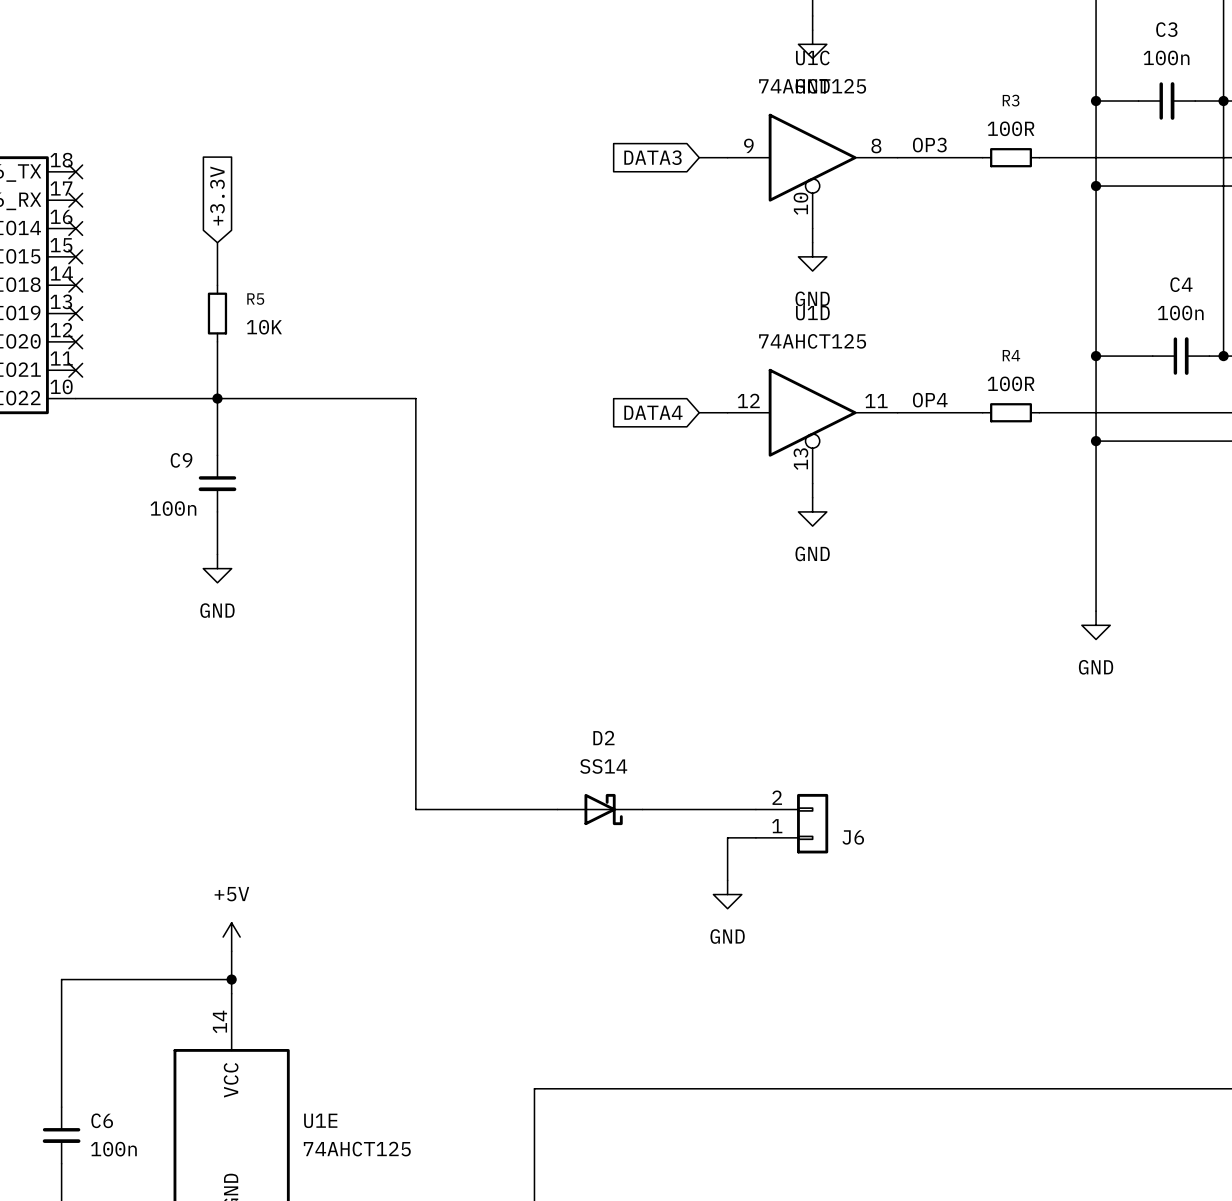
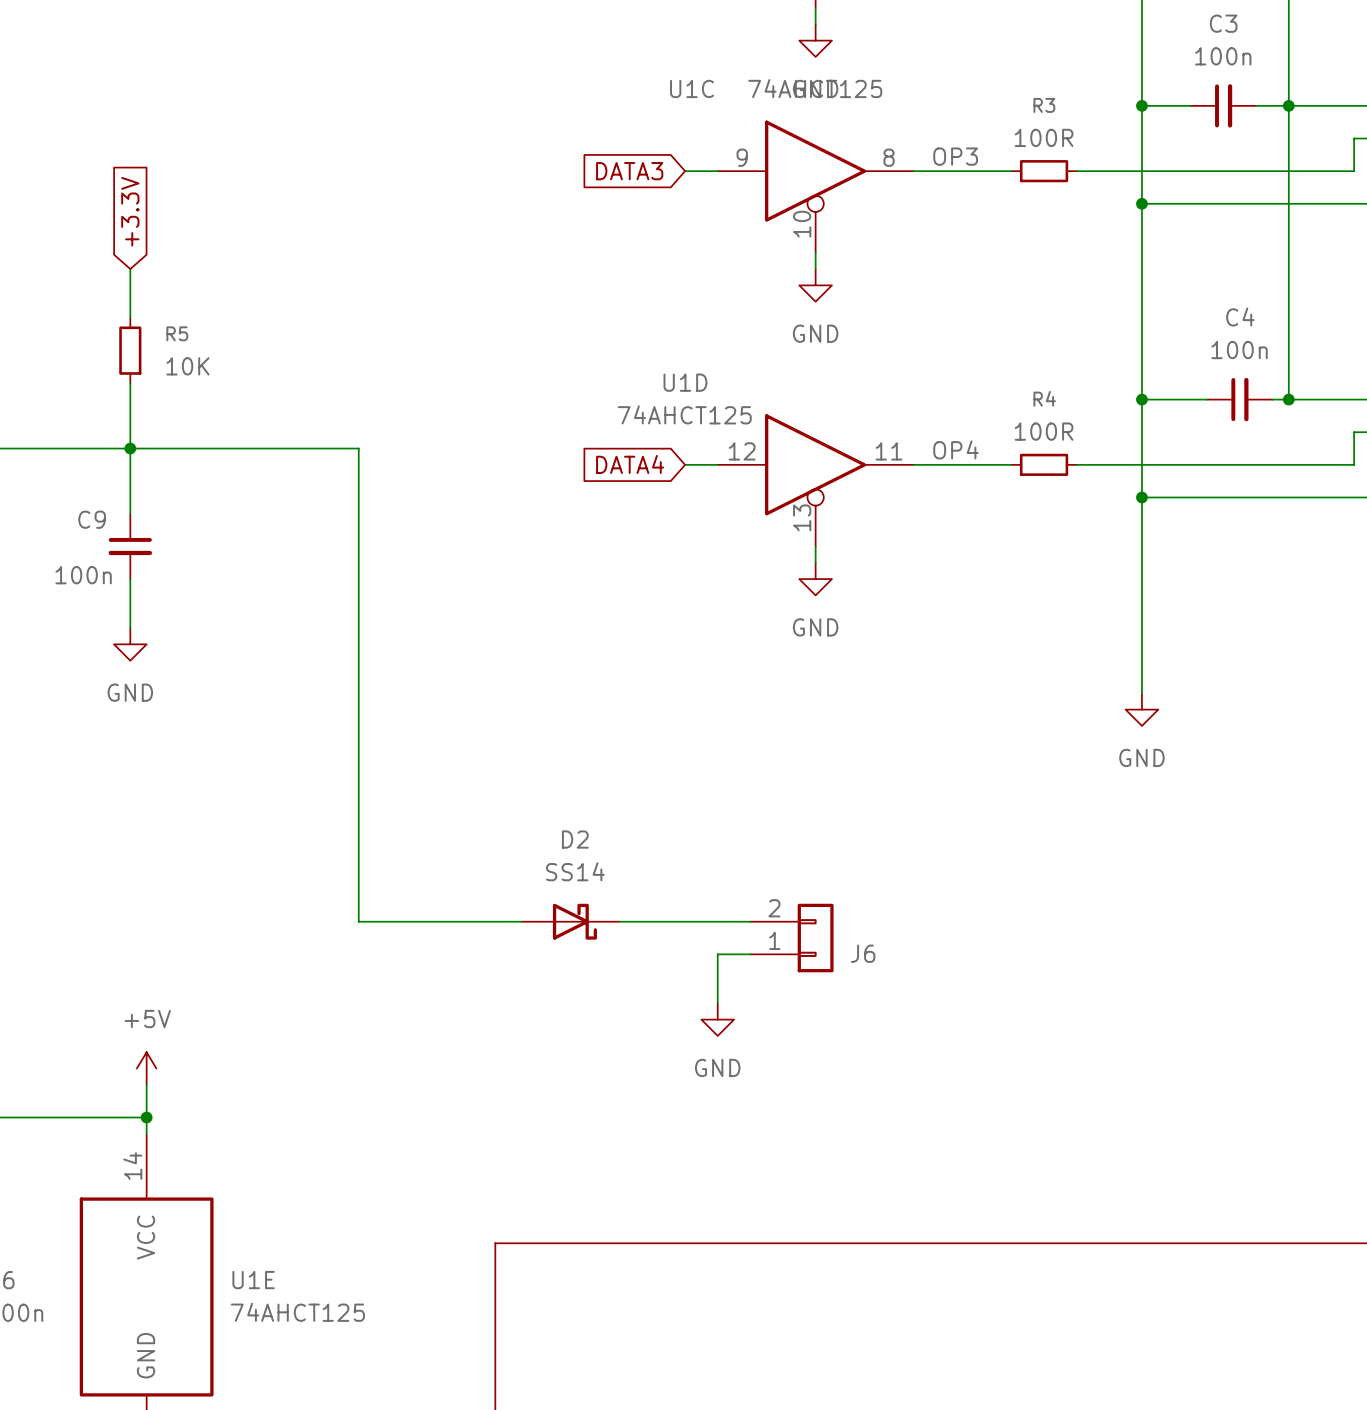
U1C name position: U1C (812, 57) -> U1C (692, 88)
U1D name position: U1D (812, 313) -> U1D (685, 382)
U1D value position: 74AHCT125 (812, 341) -> 74AHCT125 (684, 414)

